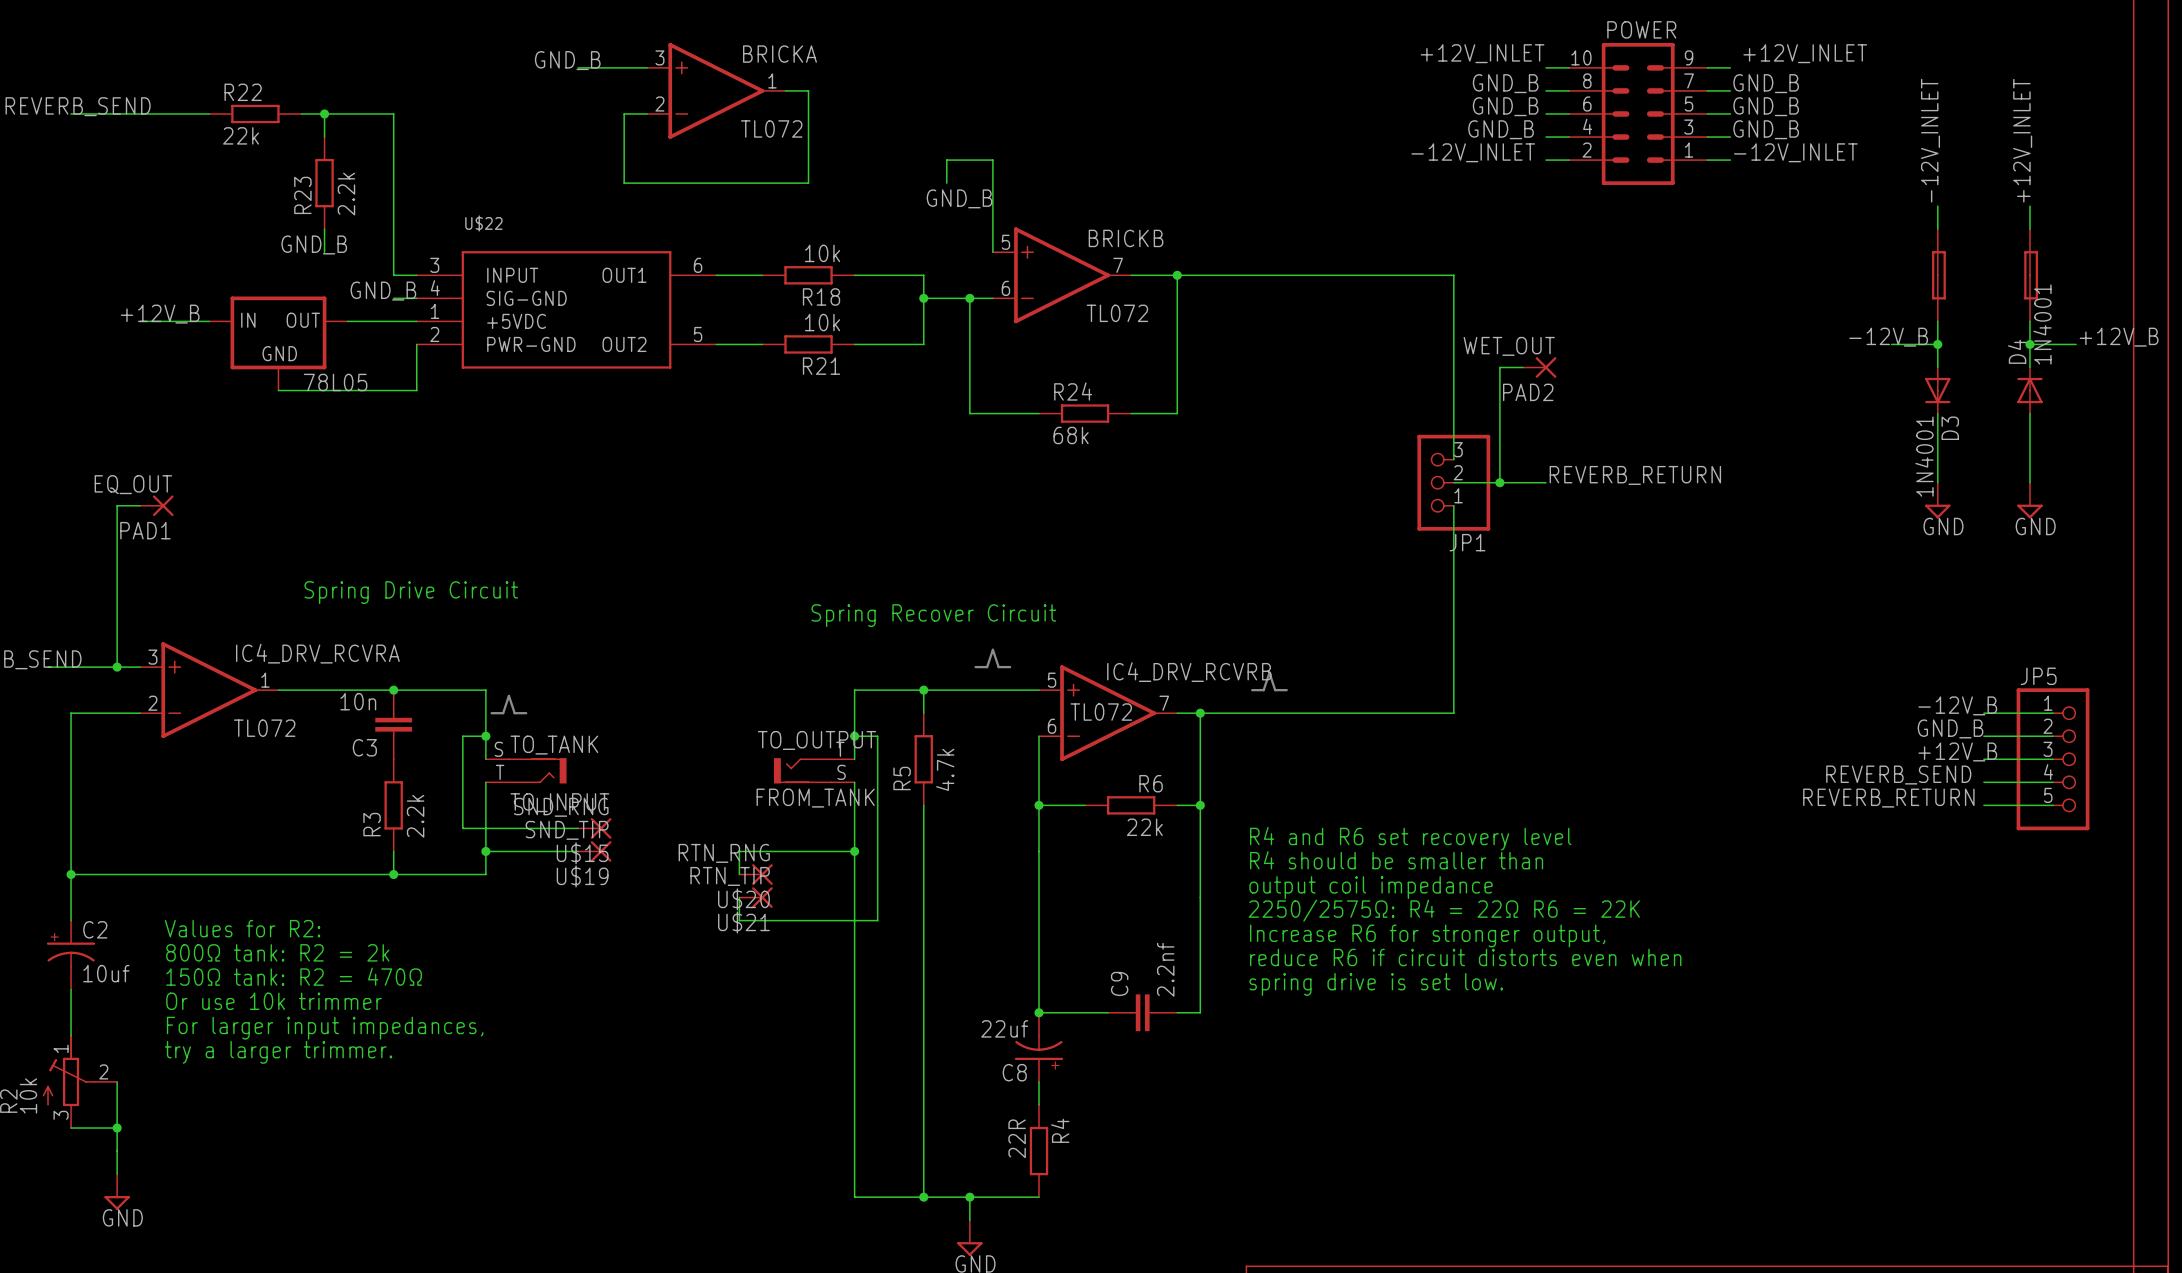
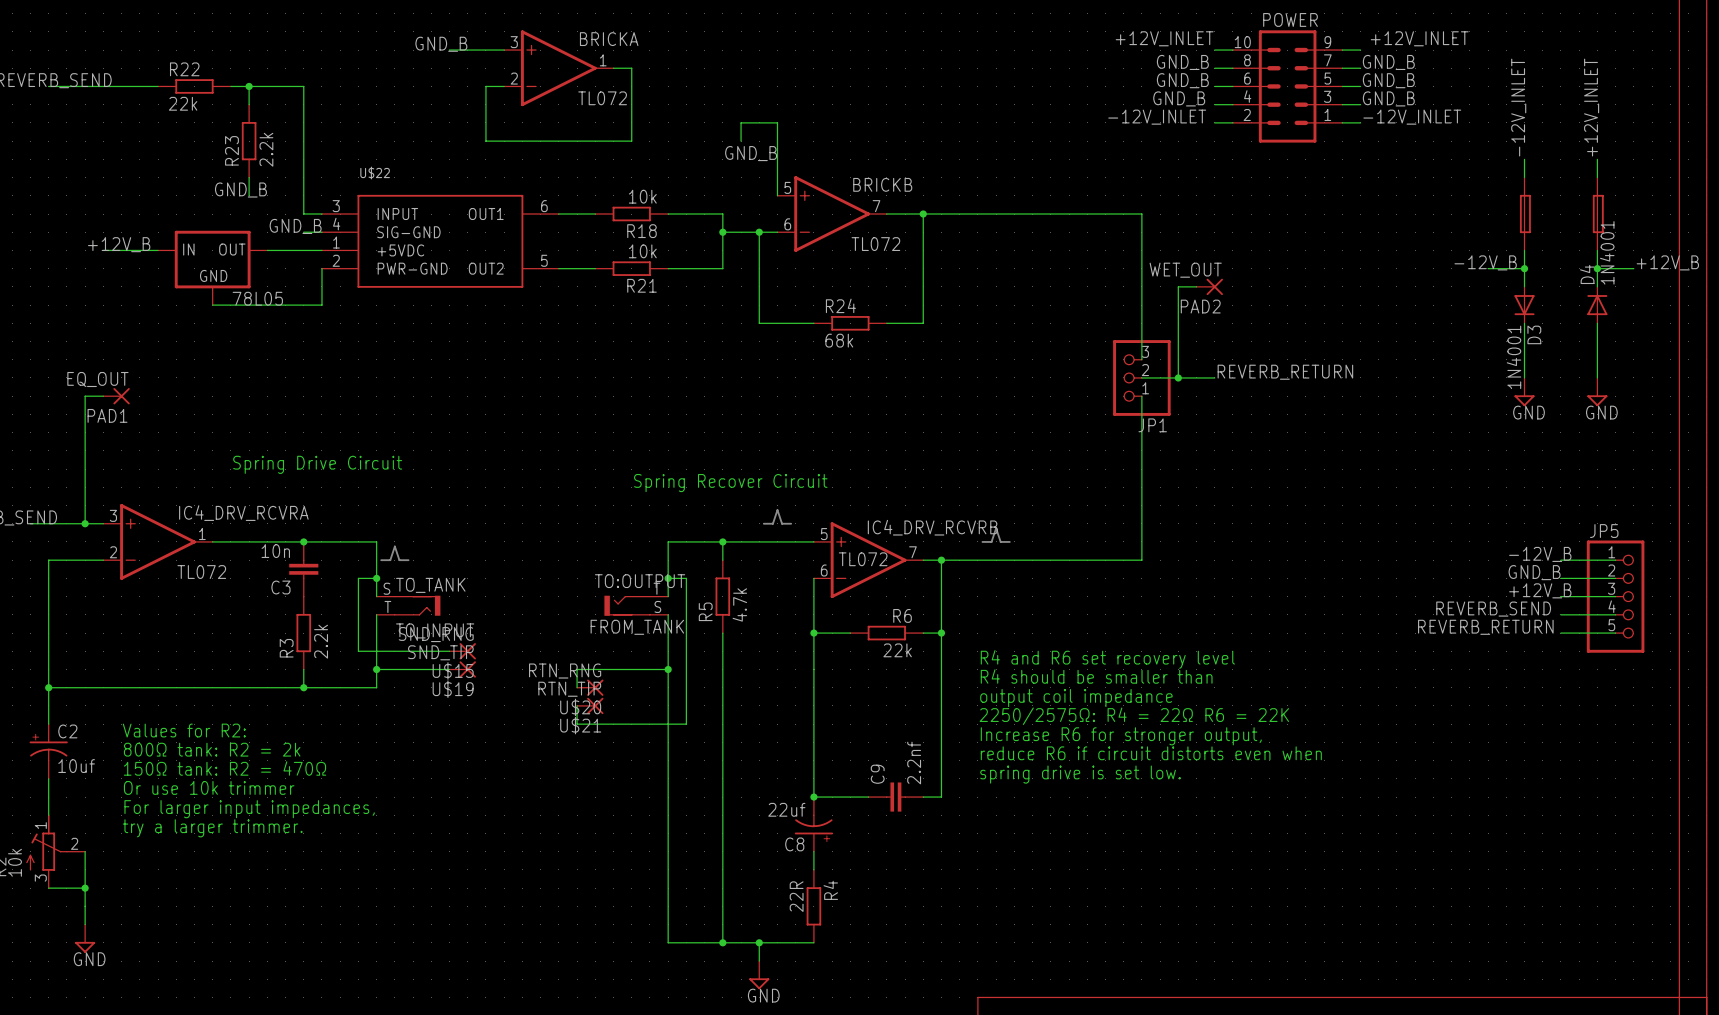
TO_OUTPUT name: TO_OUTPUT (817, 740) -> TO:OUTPUT (640, 581)

